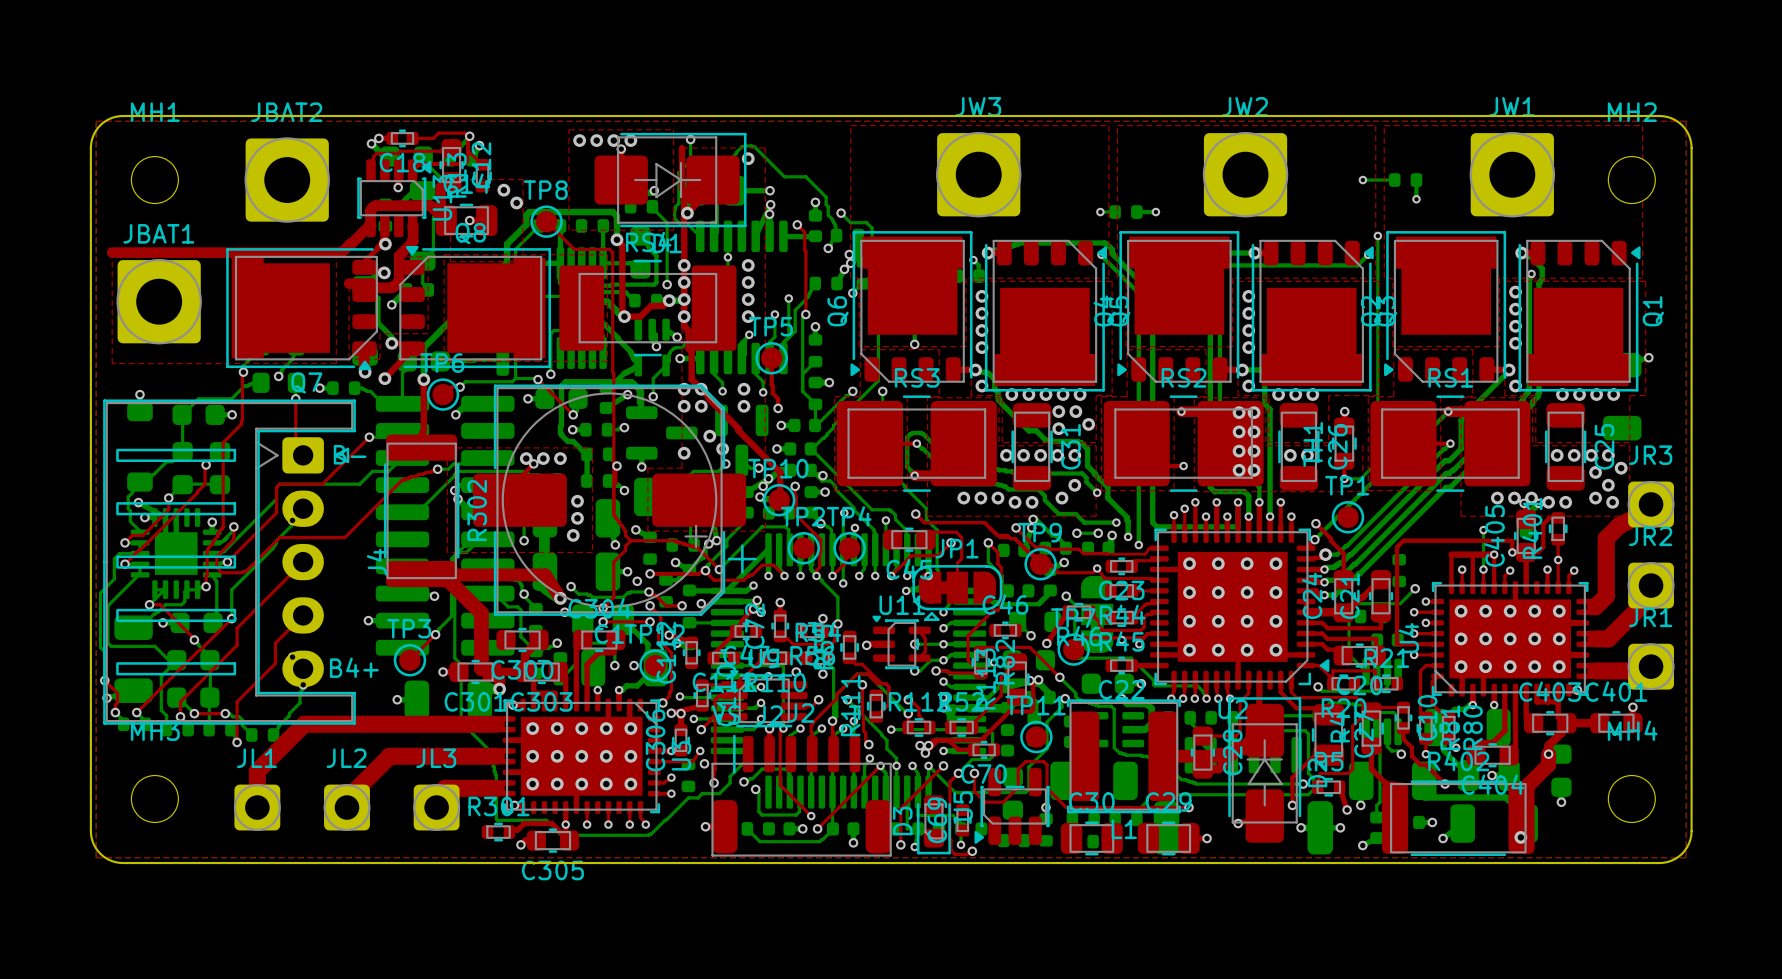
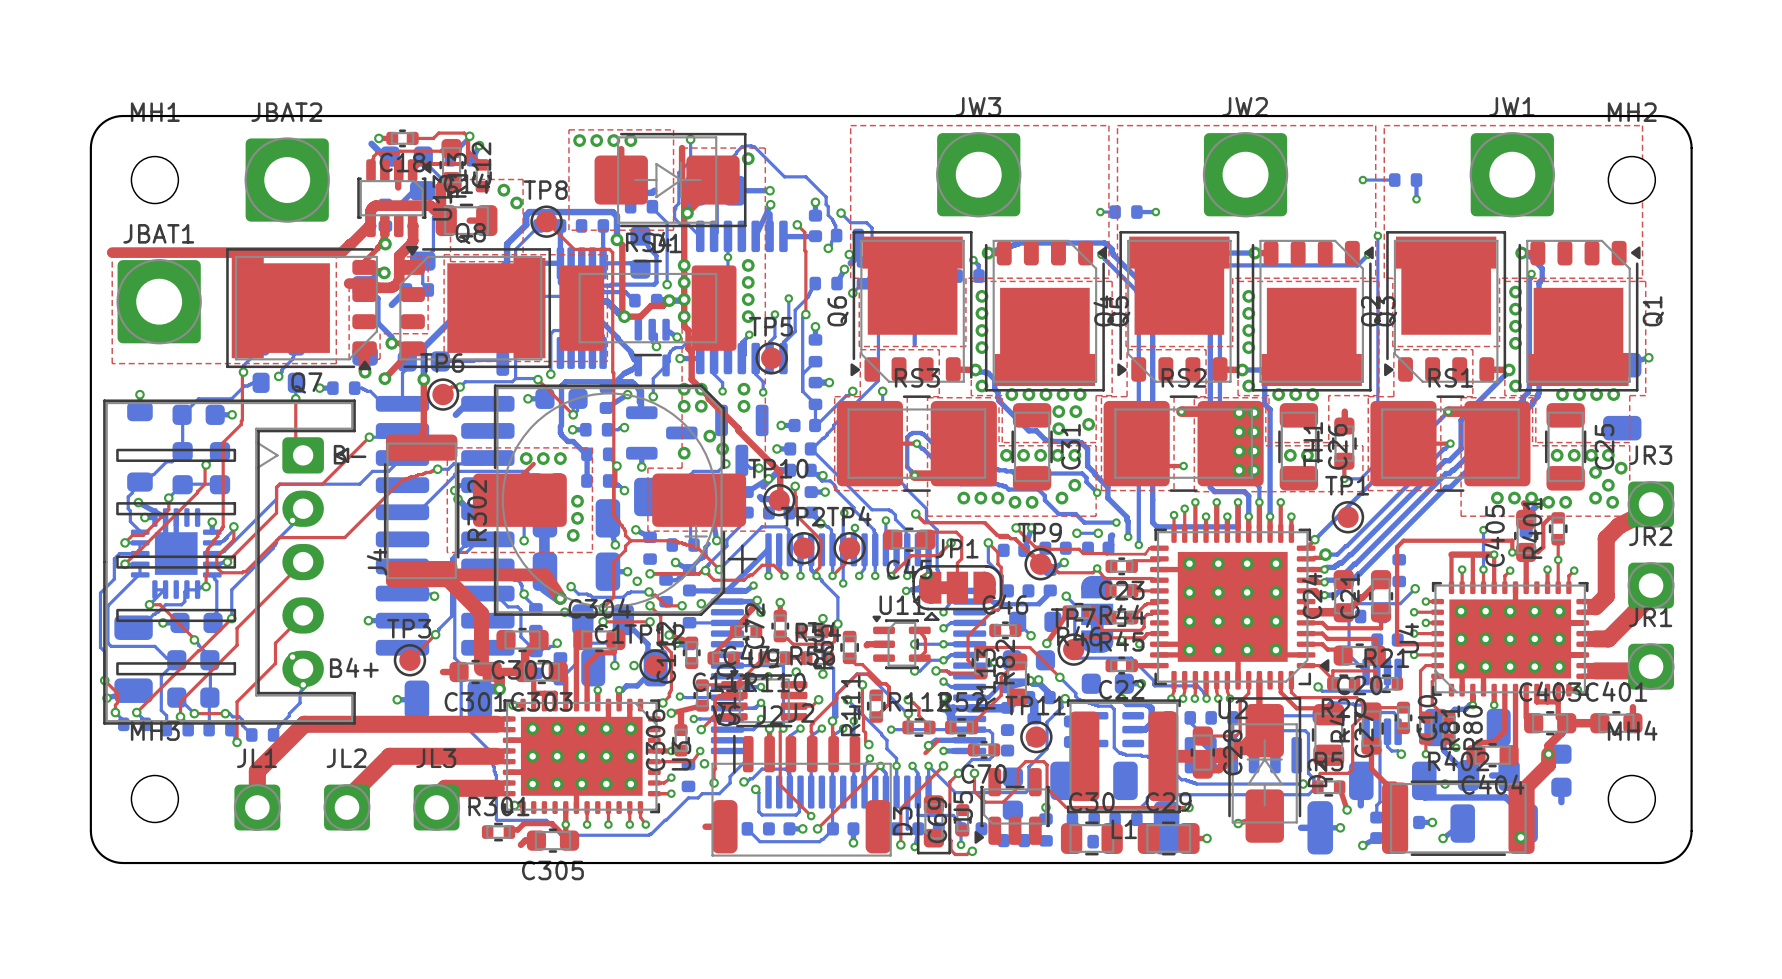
top zone outline: (96, 121) (1686, 121) (1686, 857) (96, 857) (96, 121) -> none
via: (371, 143) -> none
via: (621, 149) -> none
via: (398, 187) -> none
via: (654, 190) -> none
via: (769, 214) -> none
via: (469, 220) -> none
via: (850, 263) -> none
via: (391, 304) -> none
via: (914, 344) -> none
top track: (771, 358) (772, 393) (778, 398) (778, 408) -> none
via: (778, 408) -> none
via: (1344, 411) -> none
via: (455, 414) -> none
via: (533, 463) -> none
via: (763, 486) -> none
via: (759, 496) -> none
via: (1524, 503) -> none
bottom track: (1033, 519) (1036, 519) (1052, 535) (1055, 535) (1065, 548) -> none
via: (1033, 519) -> none
top track: (1315, 523) (1343, 553) (1343, 579) -> none
via: (1315, 523) -> none
via: (1112, 535) -> none
via: (708, 543) -> none
via: (753, 609) -> none
via: (866, 645) -> none
via: (443, 672) -> none
top track: (1029, 680) (1033, 684) (1033, 709) (1031, 711) (1009, 711) (981, 740) (933, 740) (928, 745) -> none
via: (1632, 707) -> none
via: (681, 713) -> none
top track: (1403, 728) (1403, 739) (1412, 747) (1412, 756) (1420, 764) (1425, 764) (1445, 784) -> none
top track: (947, 740) (958, 749) (973, 749) -> none
via: (920, 745) -> none
via: (925, 753) -> none
top track: (1328, 755) (1314, 755) (1292, 777) (1292, 805) -> none
via: (1492, 775) -> none
via: (1561, 802) -> none
via: (1292, 805) -> none
via: (1360, 805) -> none
via: (705, 826) -> none
via: (1301, 827) -> none
via: (520, 844) -> none

